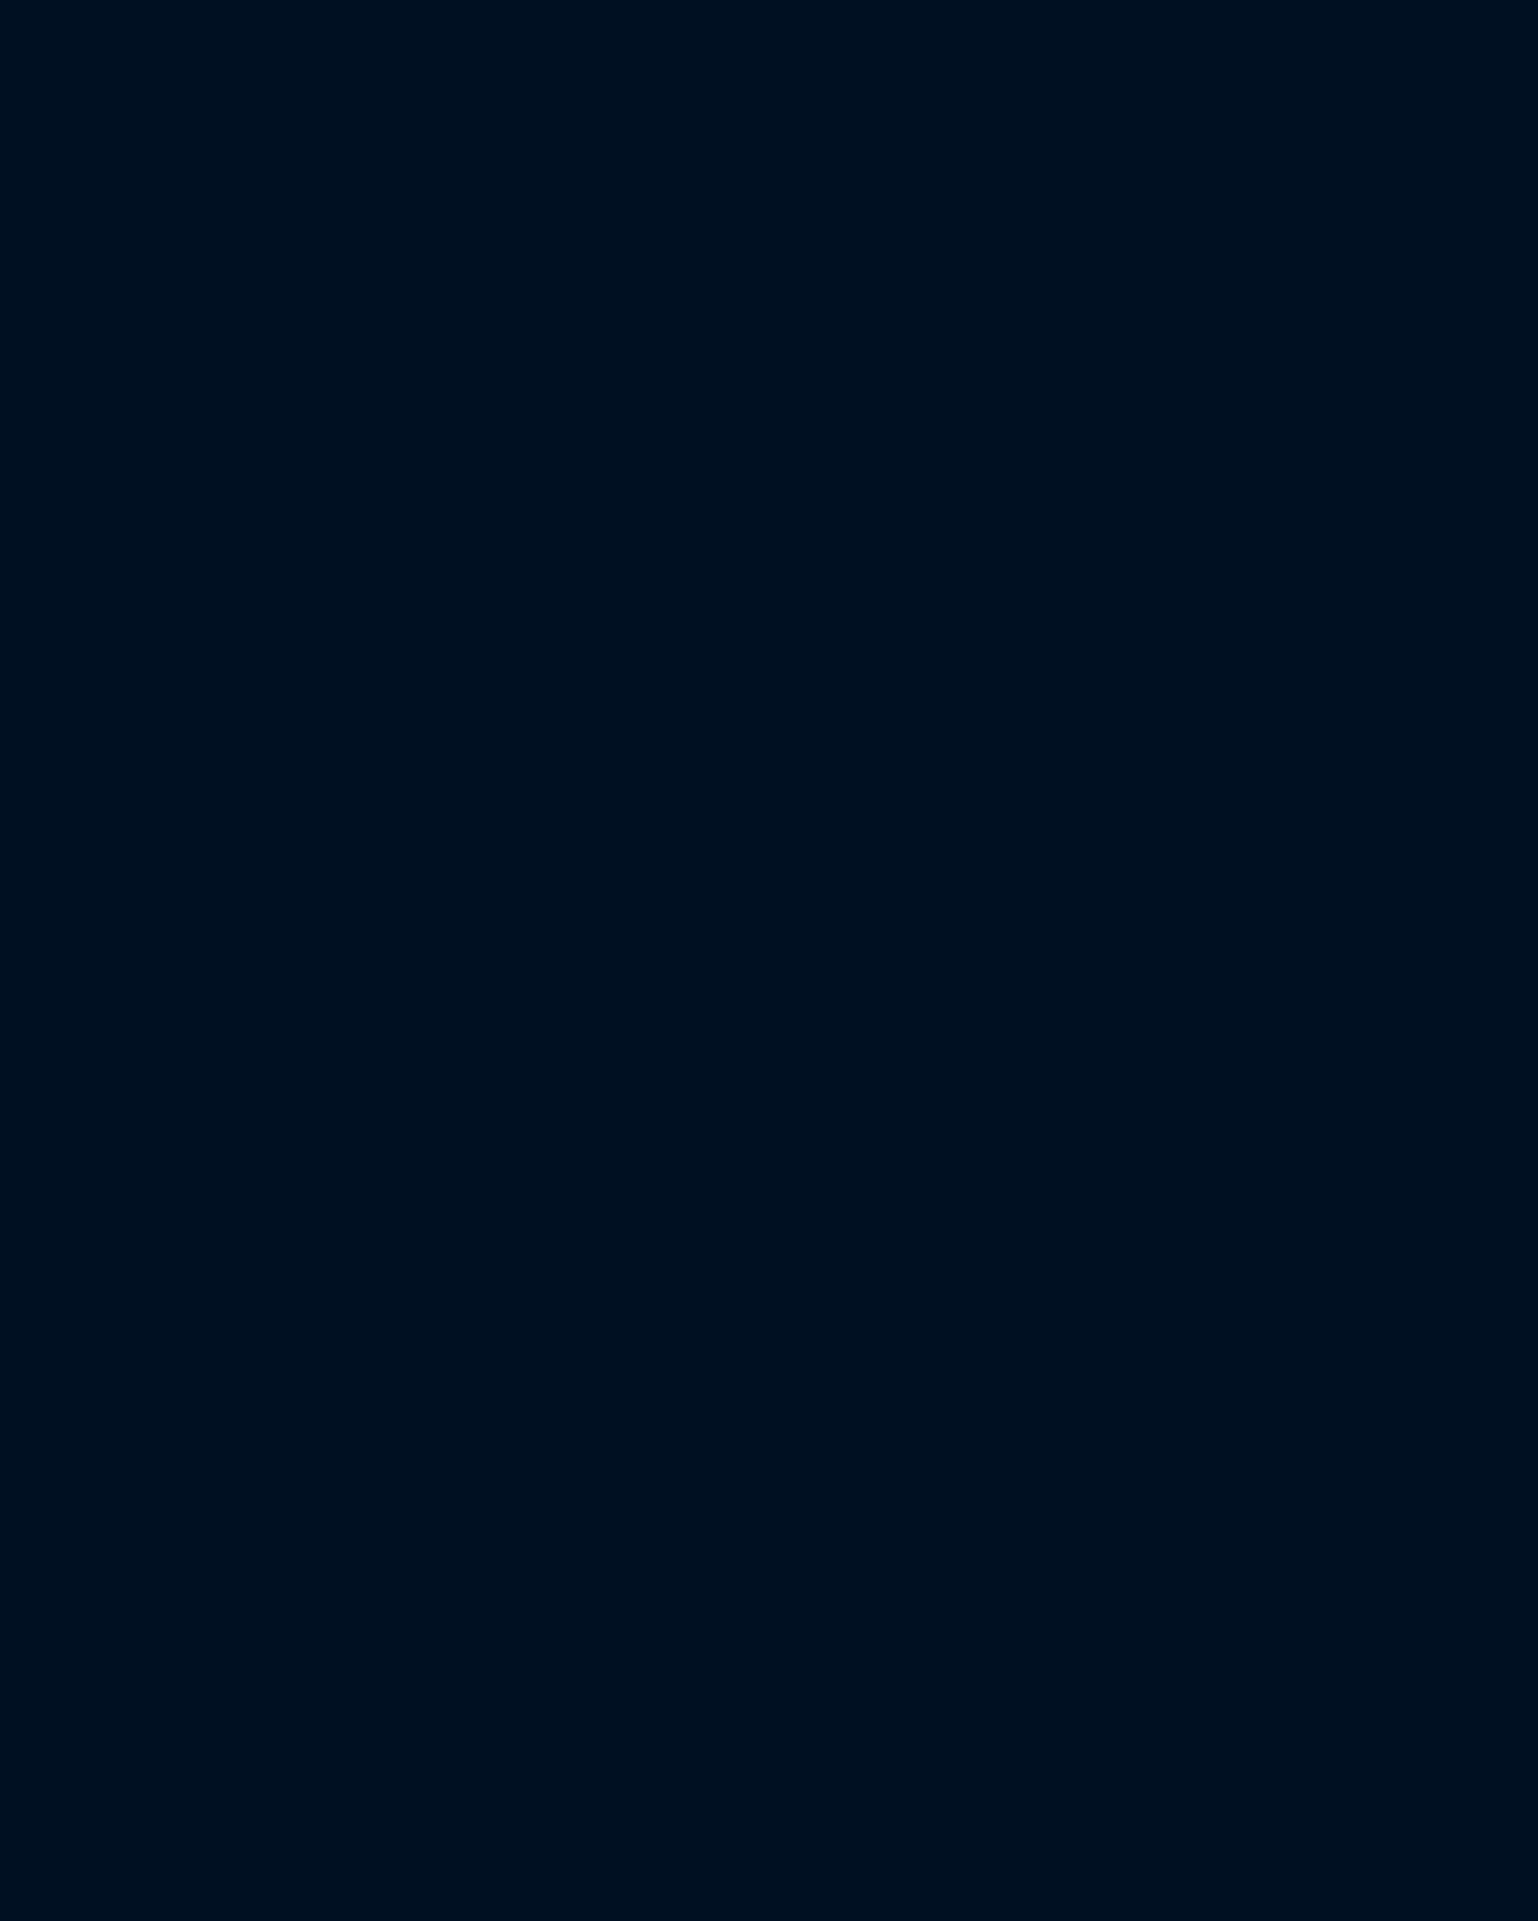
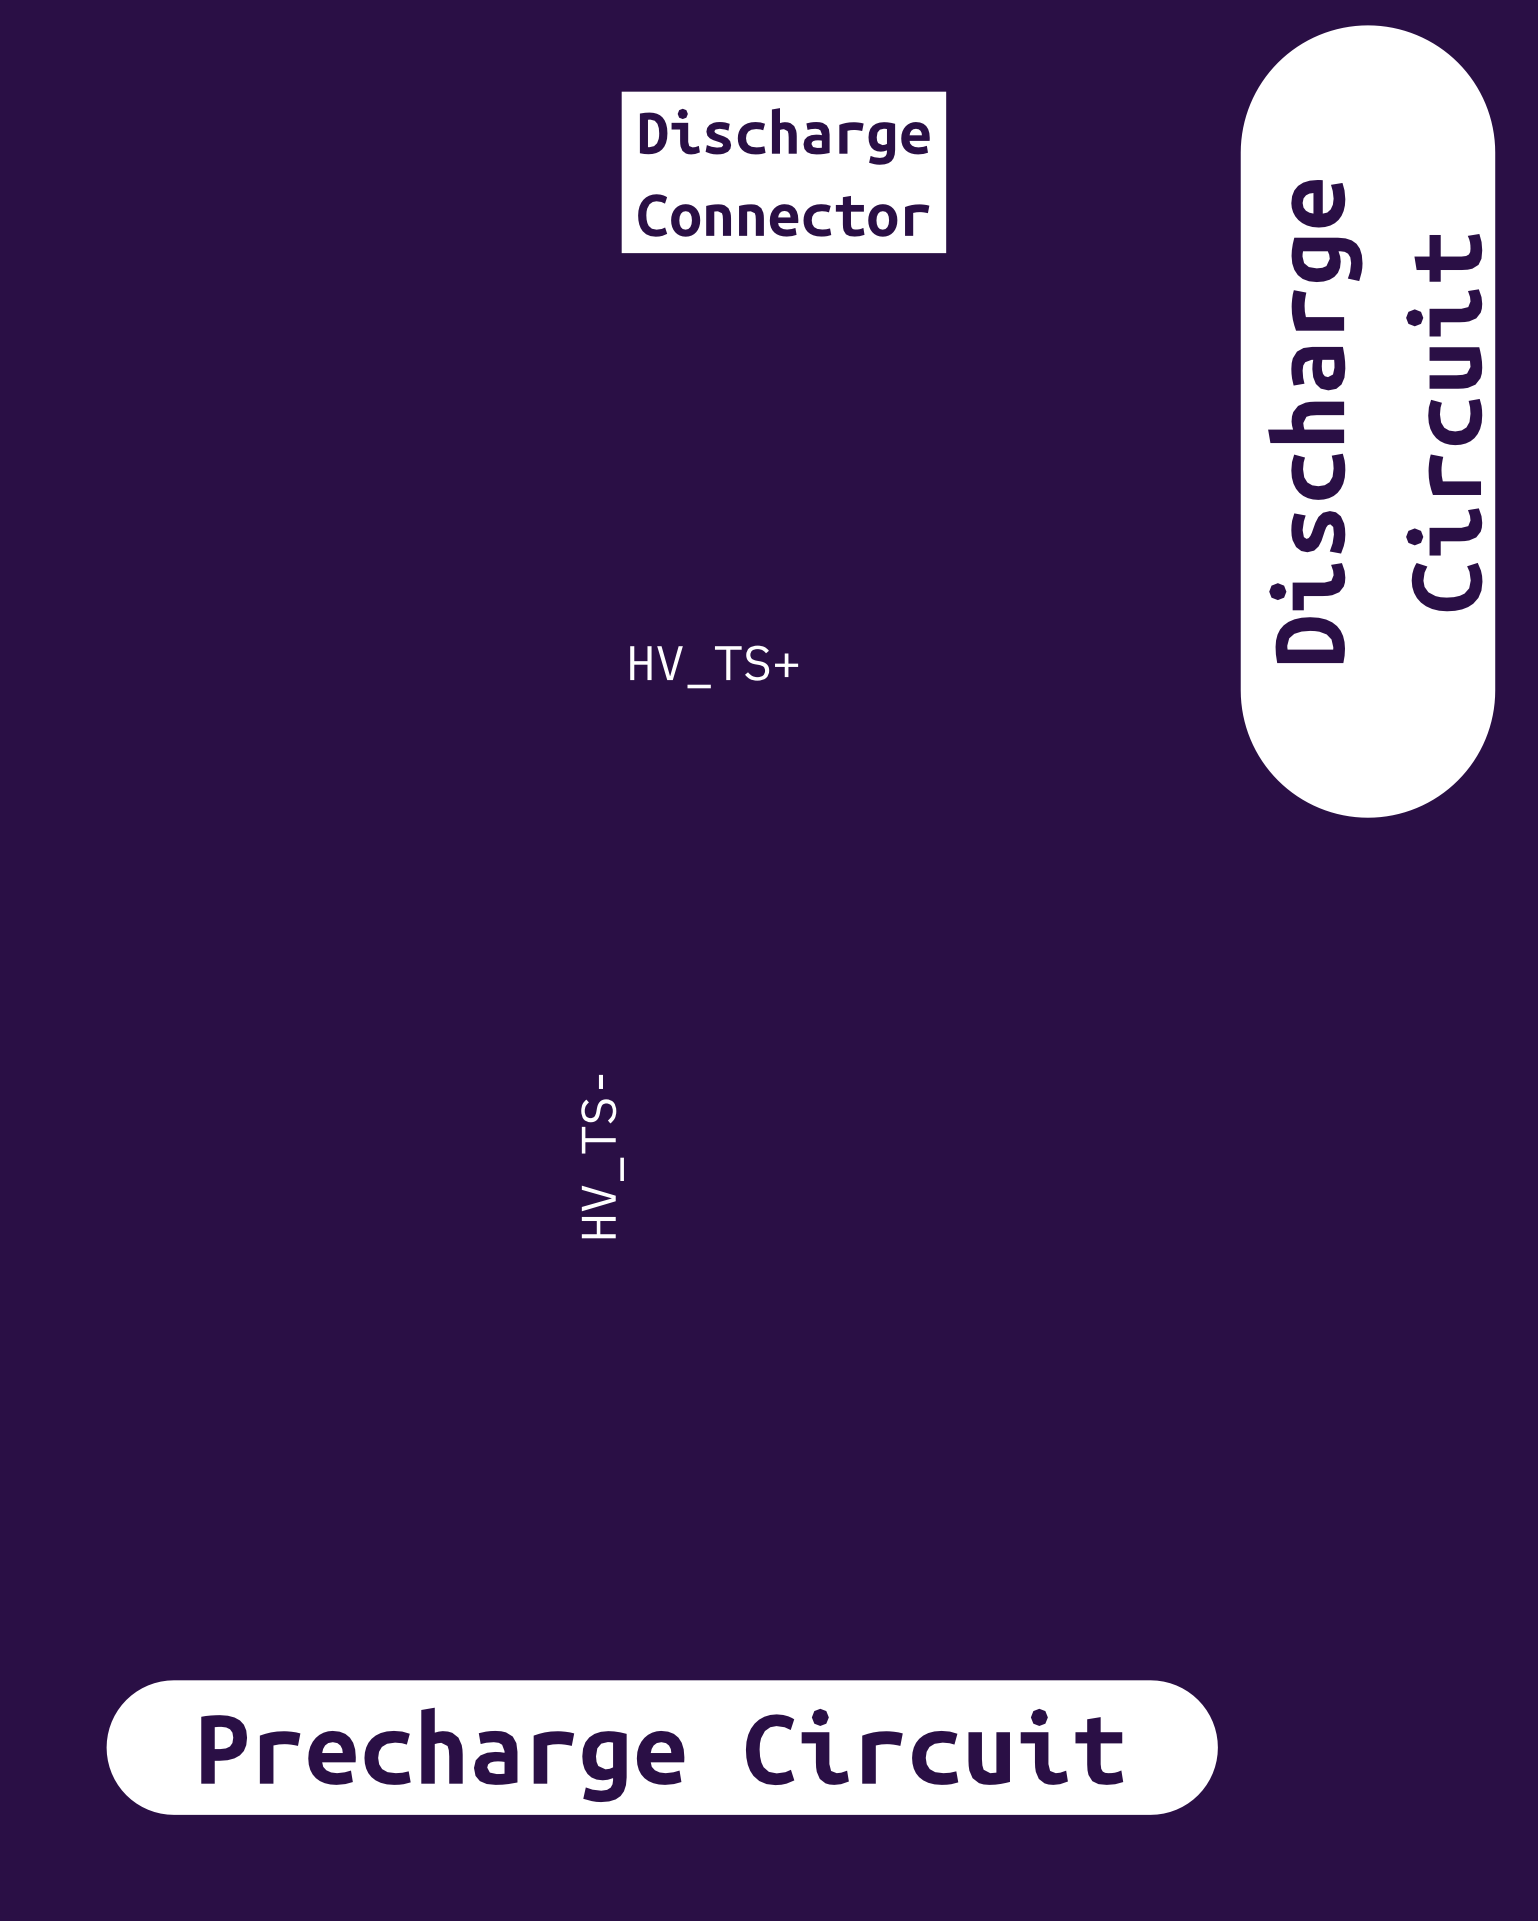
drawing: none -> [1240, 25, 1496, 818]
drawing: none -> [621, 91, 947, 254]
text: none -> HV_TS+ (714, 666)
text: none -> HV_TS- (602, 1156)
drawing: none -> [106, 1680, 1218, 1815]

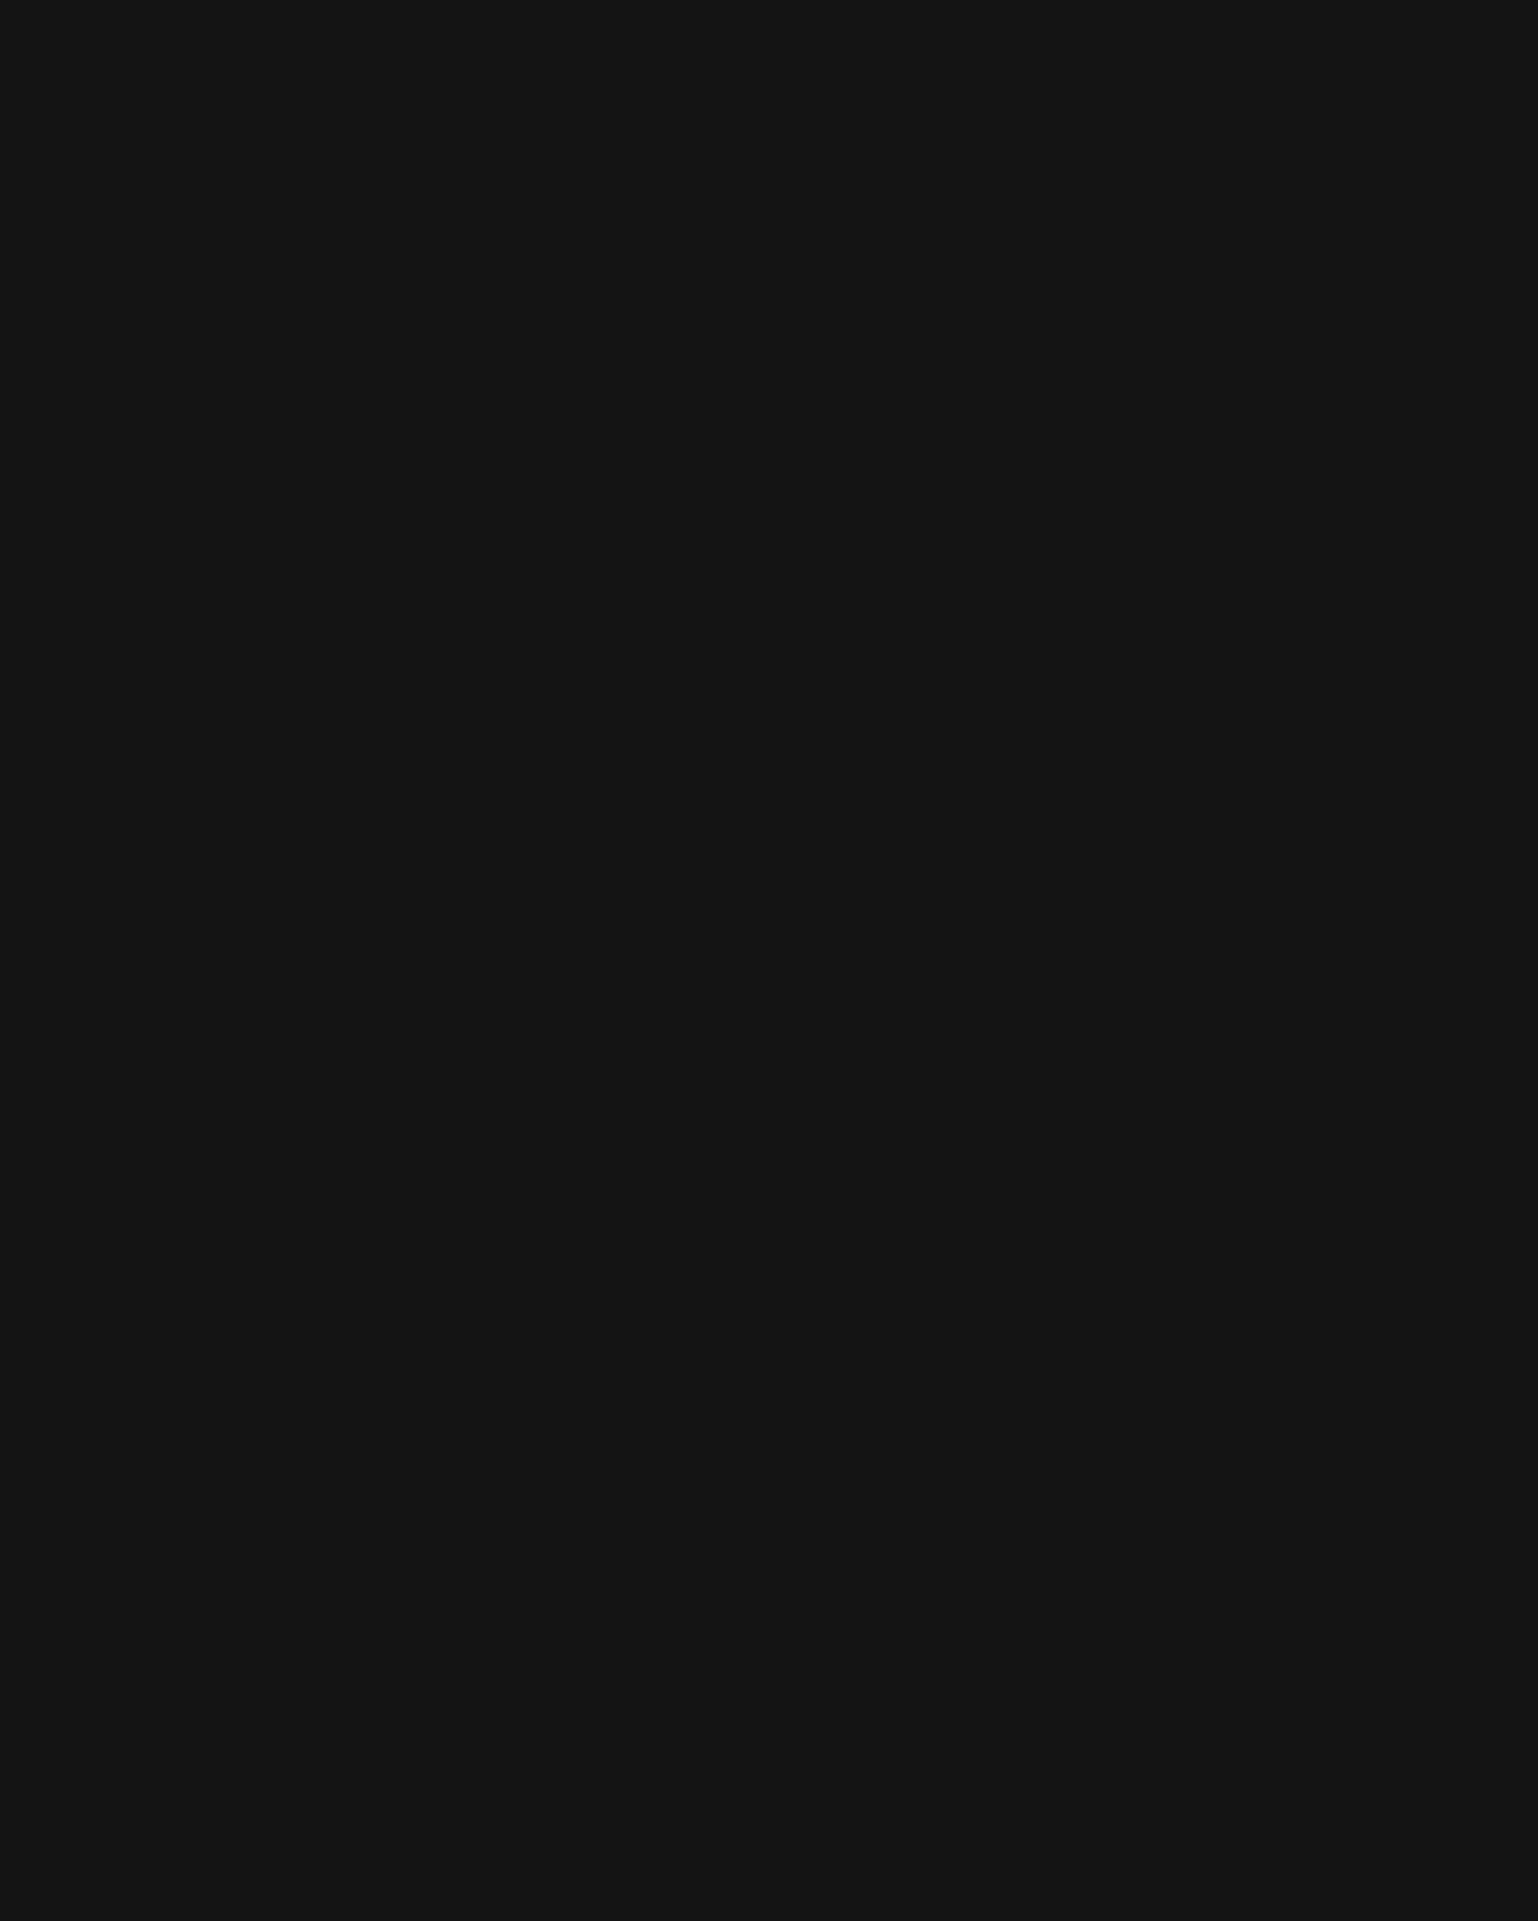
drawing: [1240, 25, 1496, 818] -> none
drawing: [621, 91, 947, 254] -> none
text: HV_TS+ (714, 666) -> none
text: HV_TS- (602, 1156) -> none
drawing: [106, 1680, 1218, 1815] -> none

